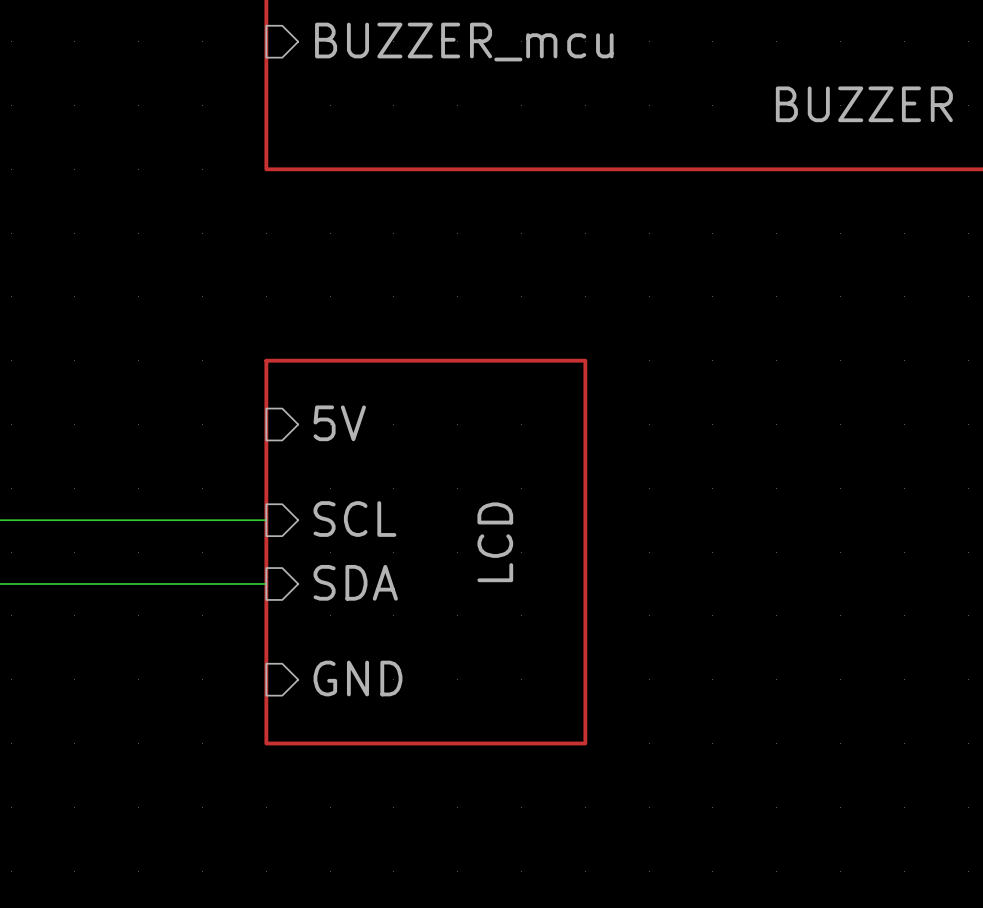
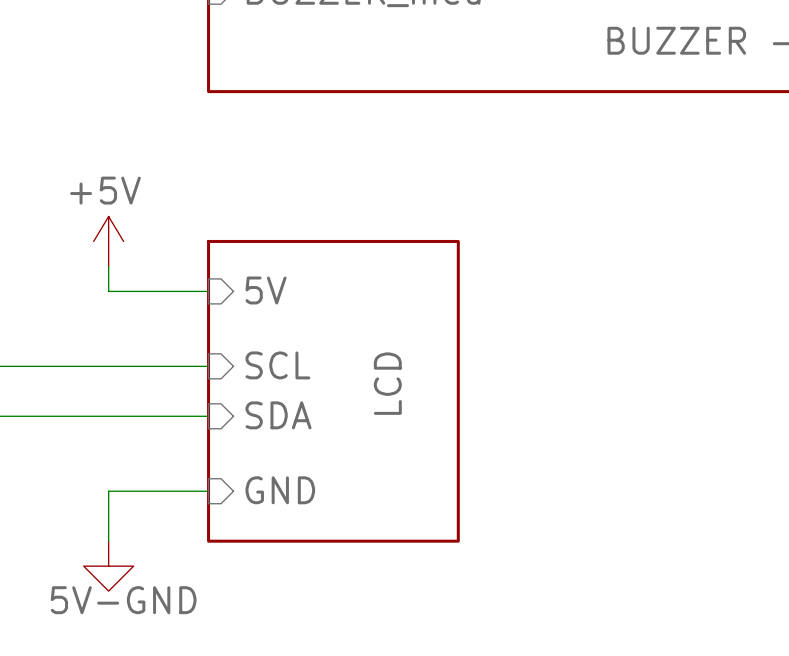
power symbol: none -> +5V (108, 241)
wire: none -> (108, 266) (108, 291) (208, 291)
wire: none -> (208, 491) (108, 491) (108, 541)
power symbol: none -> 5V-GND (108, 566)

